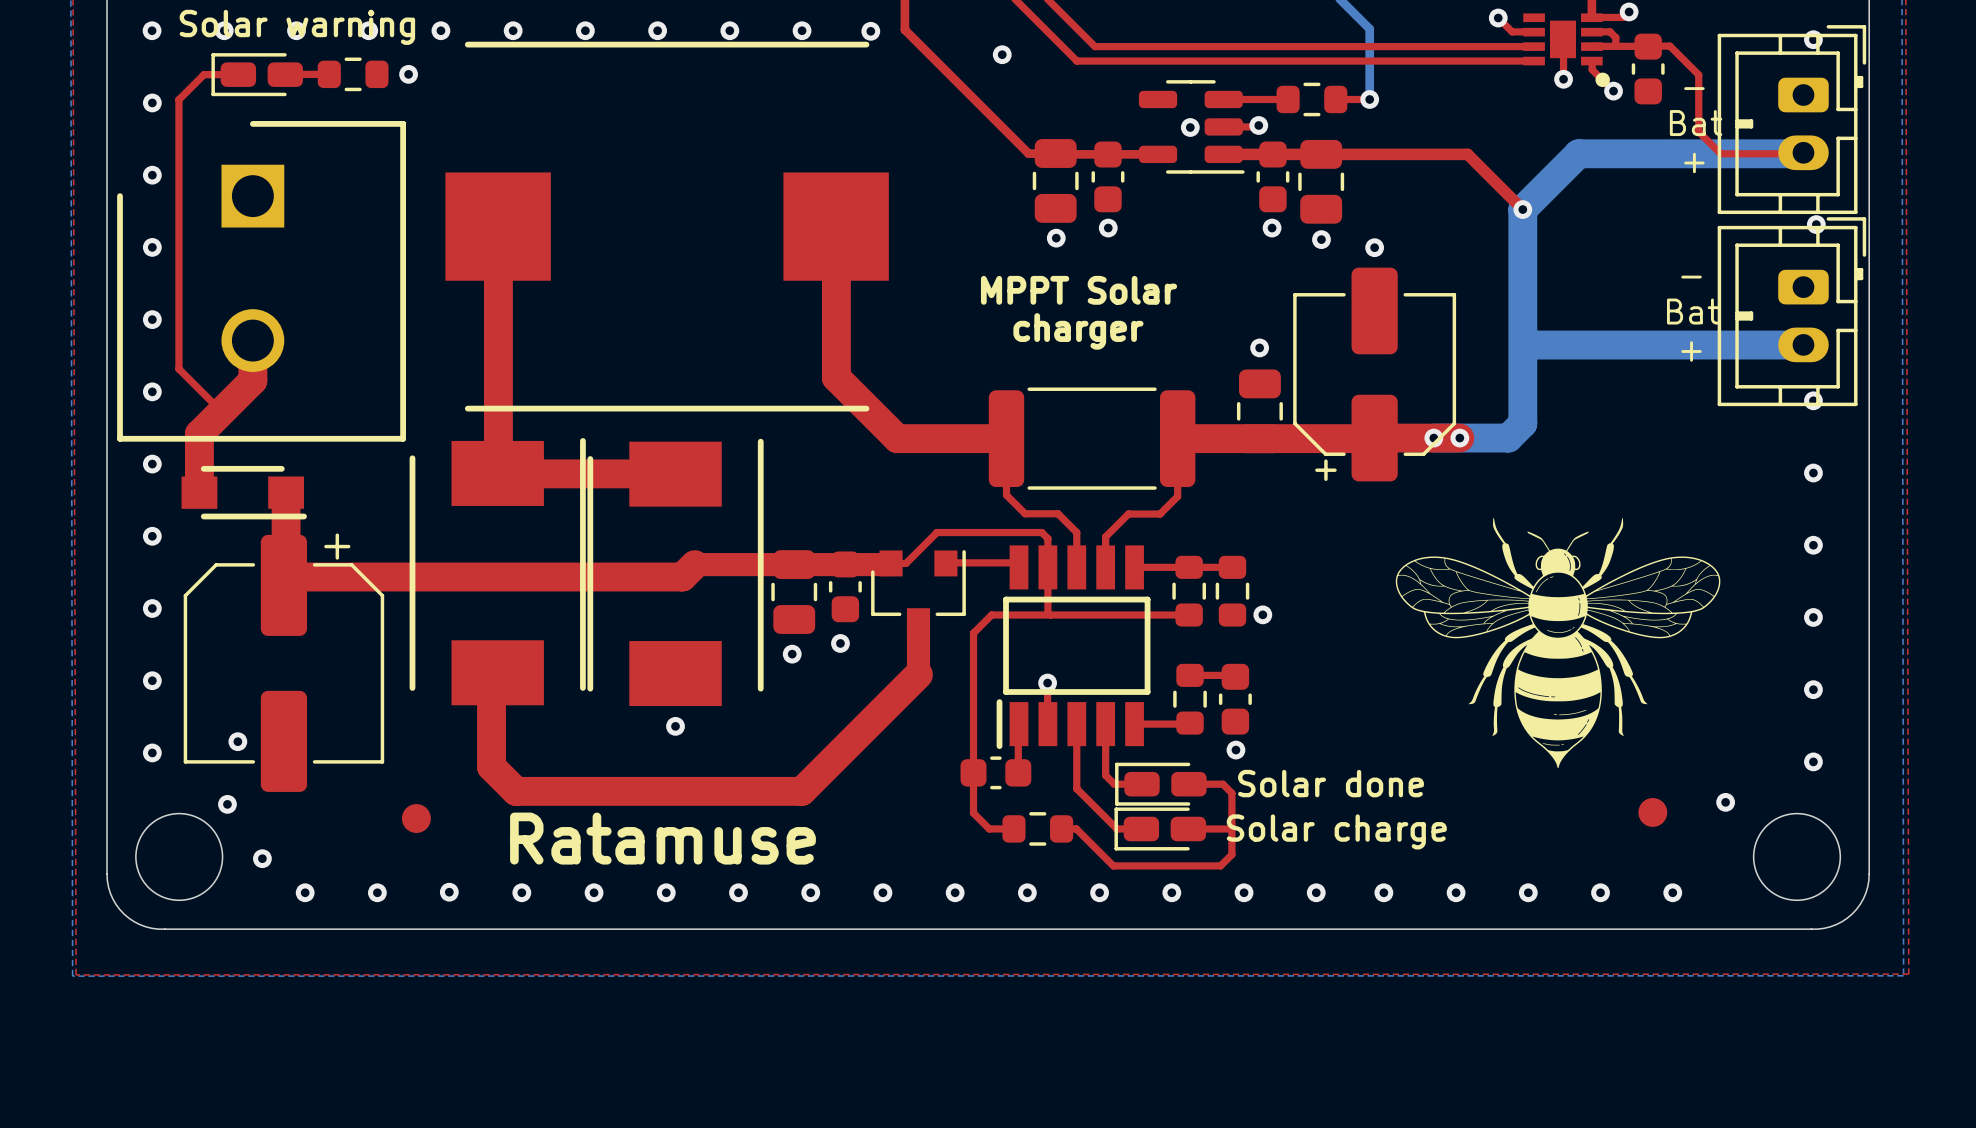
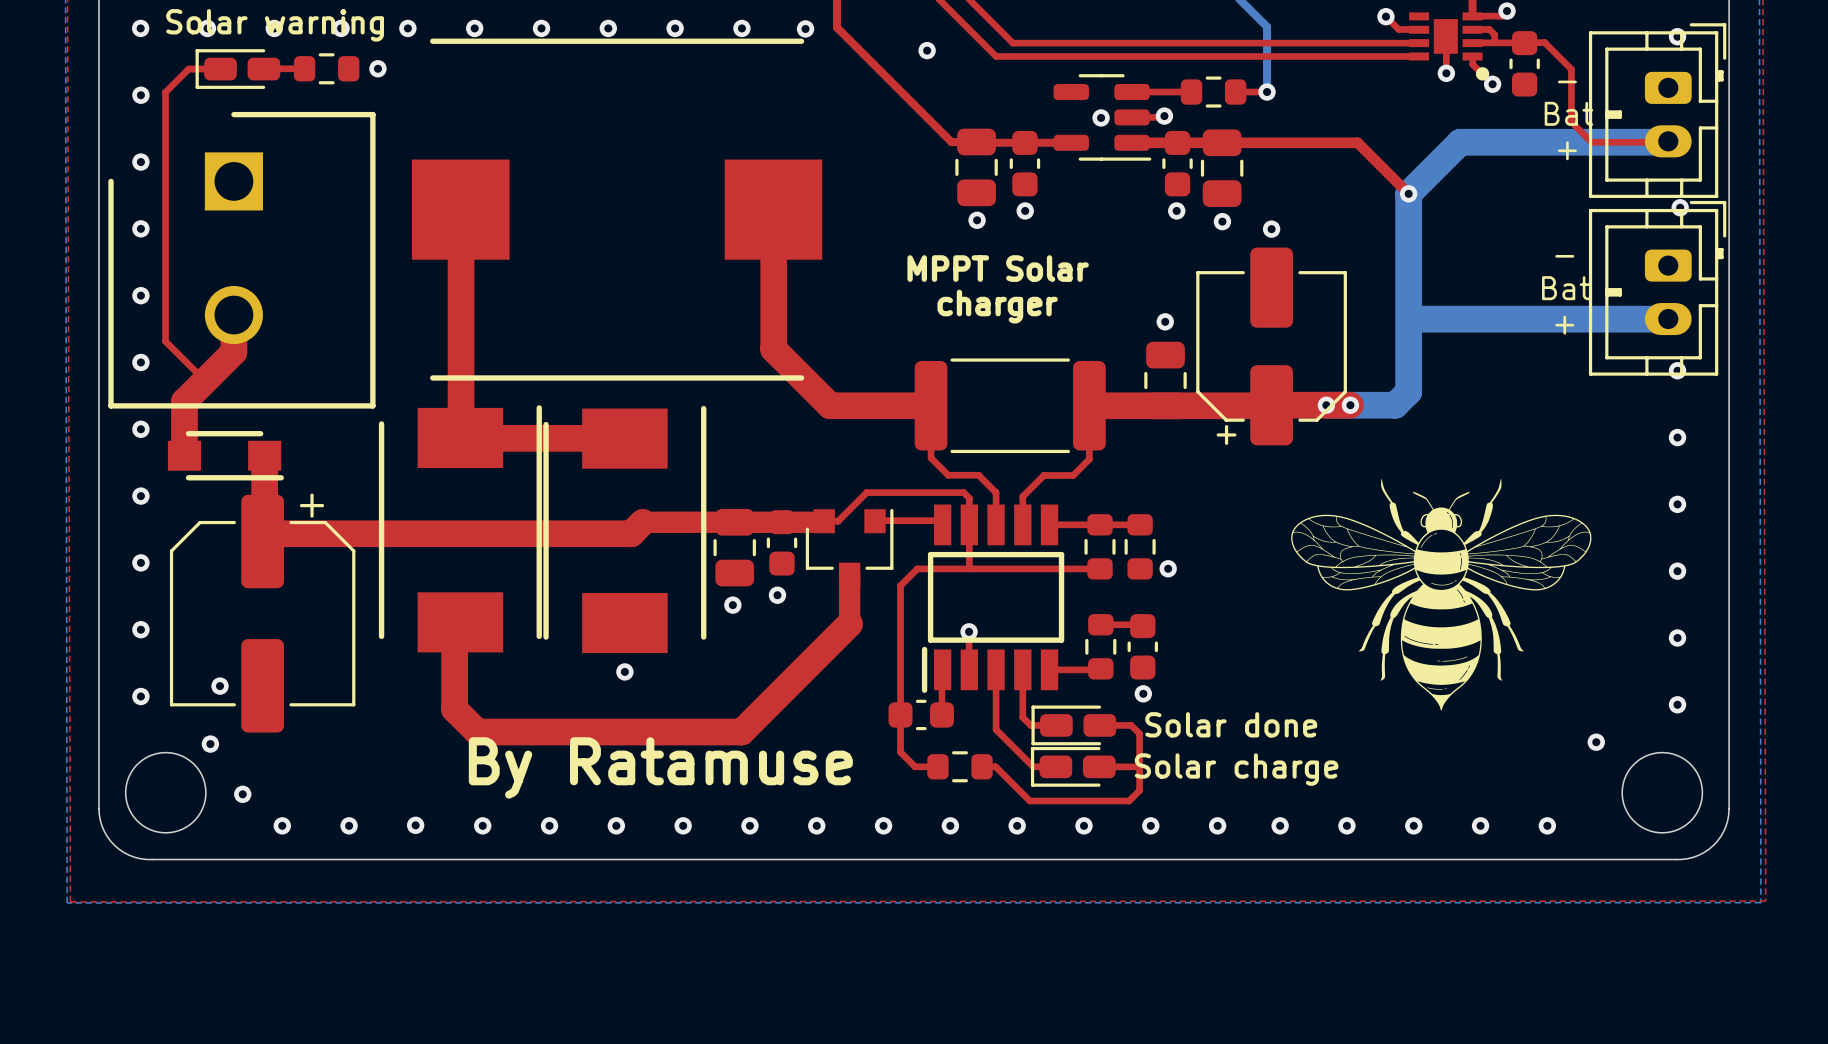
part: (1652, 812) -> none
part: (416, 818) -> none
text: Ratamuse (662, 838) -> By Ratamuse (660, 767)

